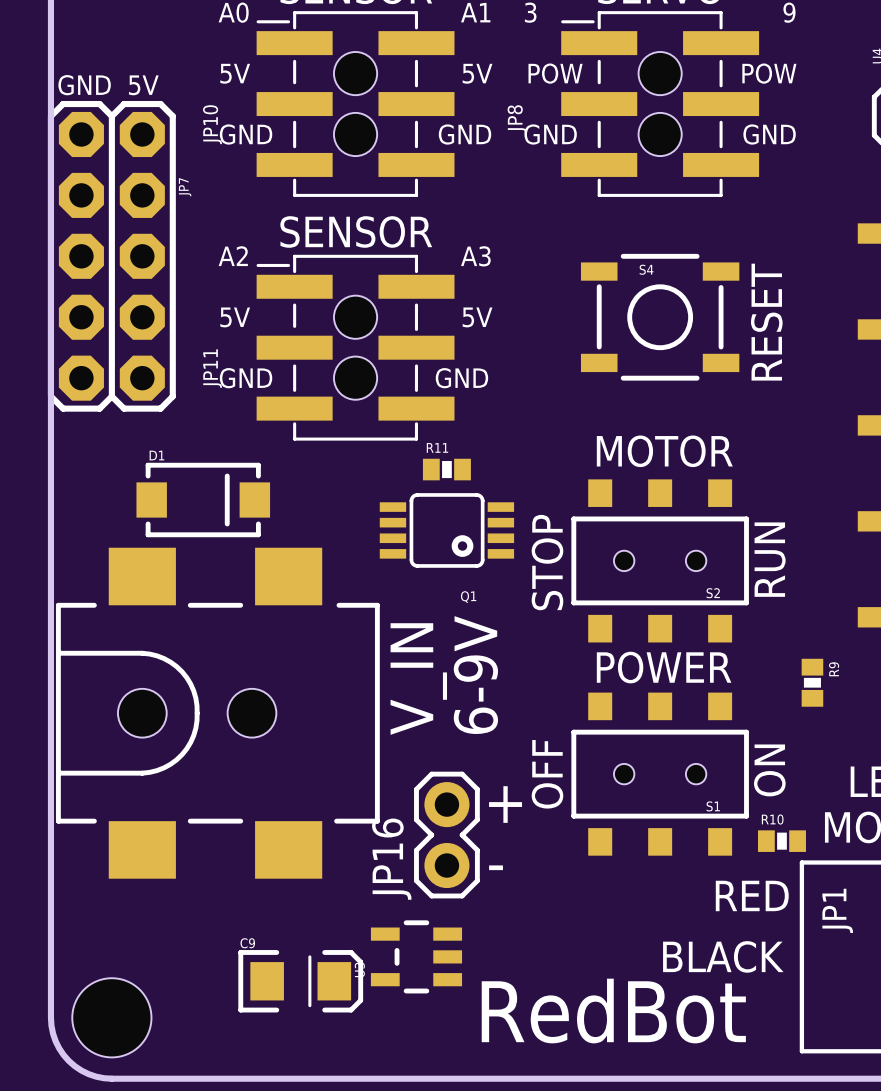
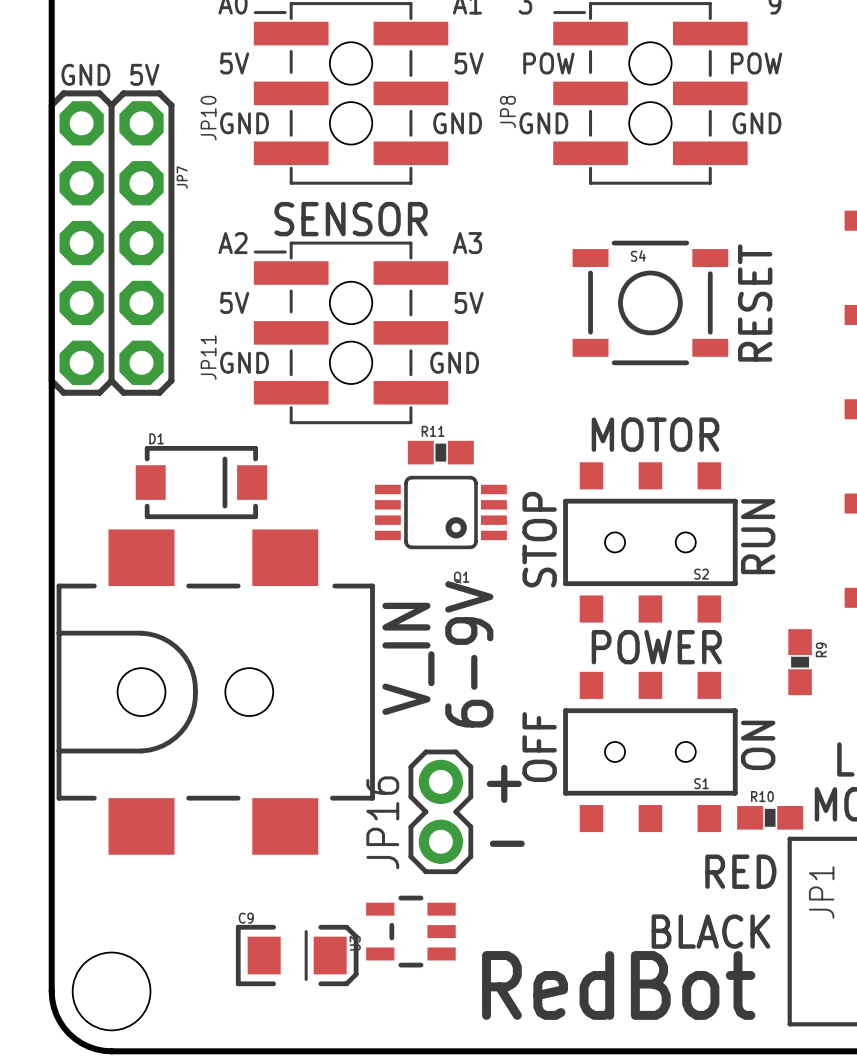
R11 footprint: [422, 458, 471, 481] -> [407, 440, 474, 465]
R9 footprint: [801, 658, 824, 707] -> [788, 629, 812, 696]
R10 footprint: [758, 830, 806, 852] -> [737, 806, 804, 830]

